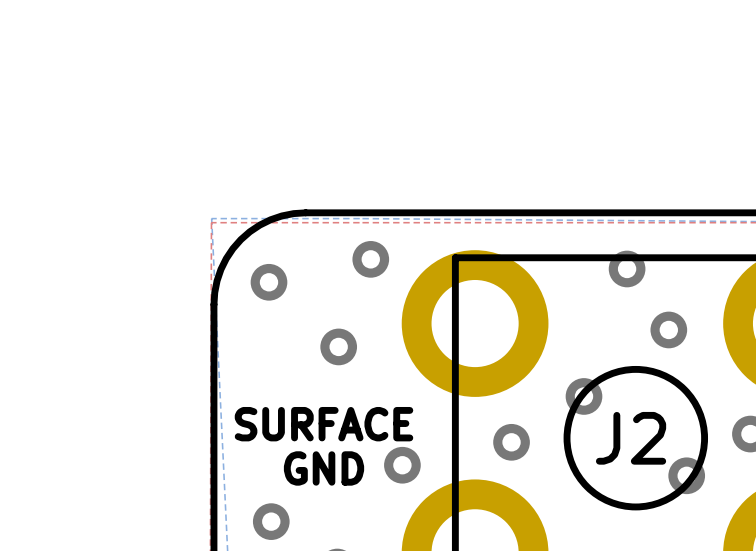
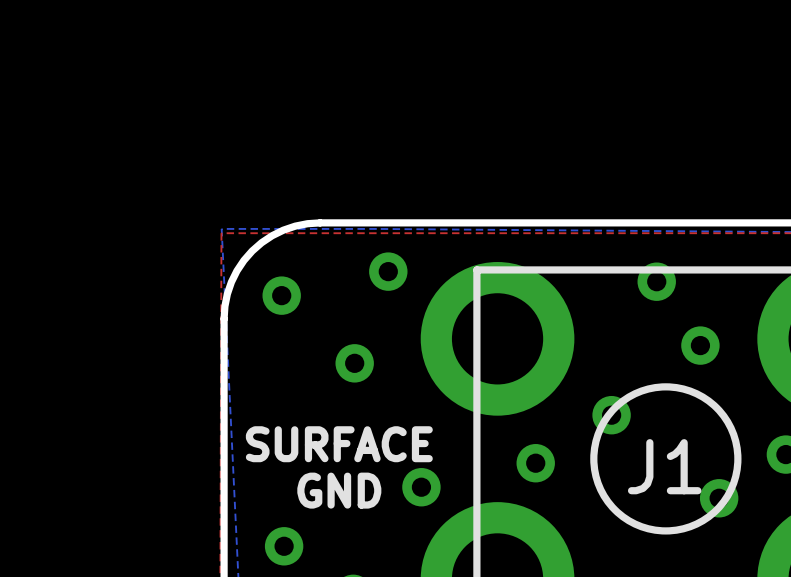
J2 name: J2 (631, 438) -> J1 (664, 466)

